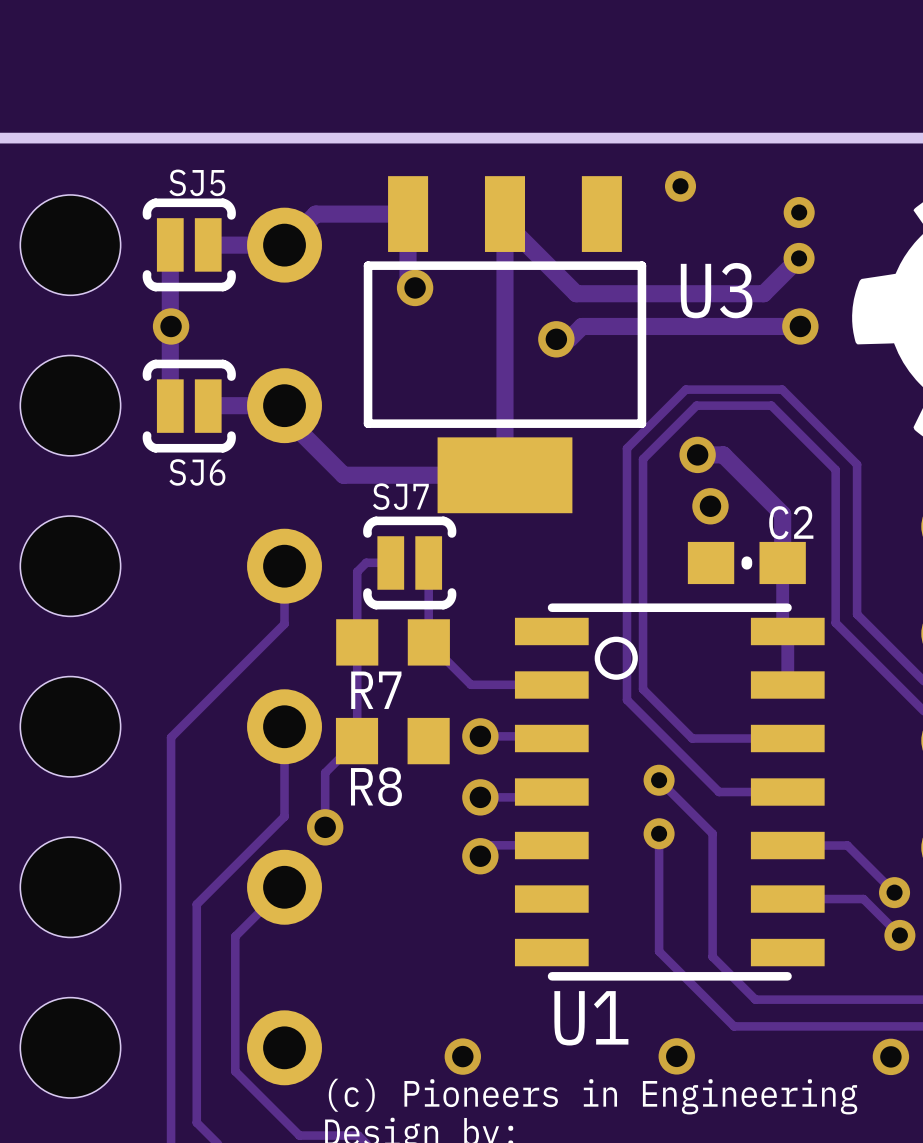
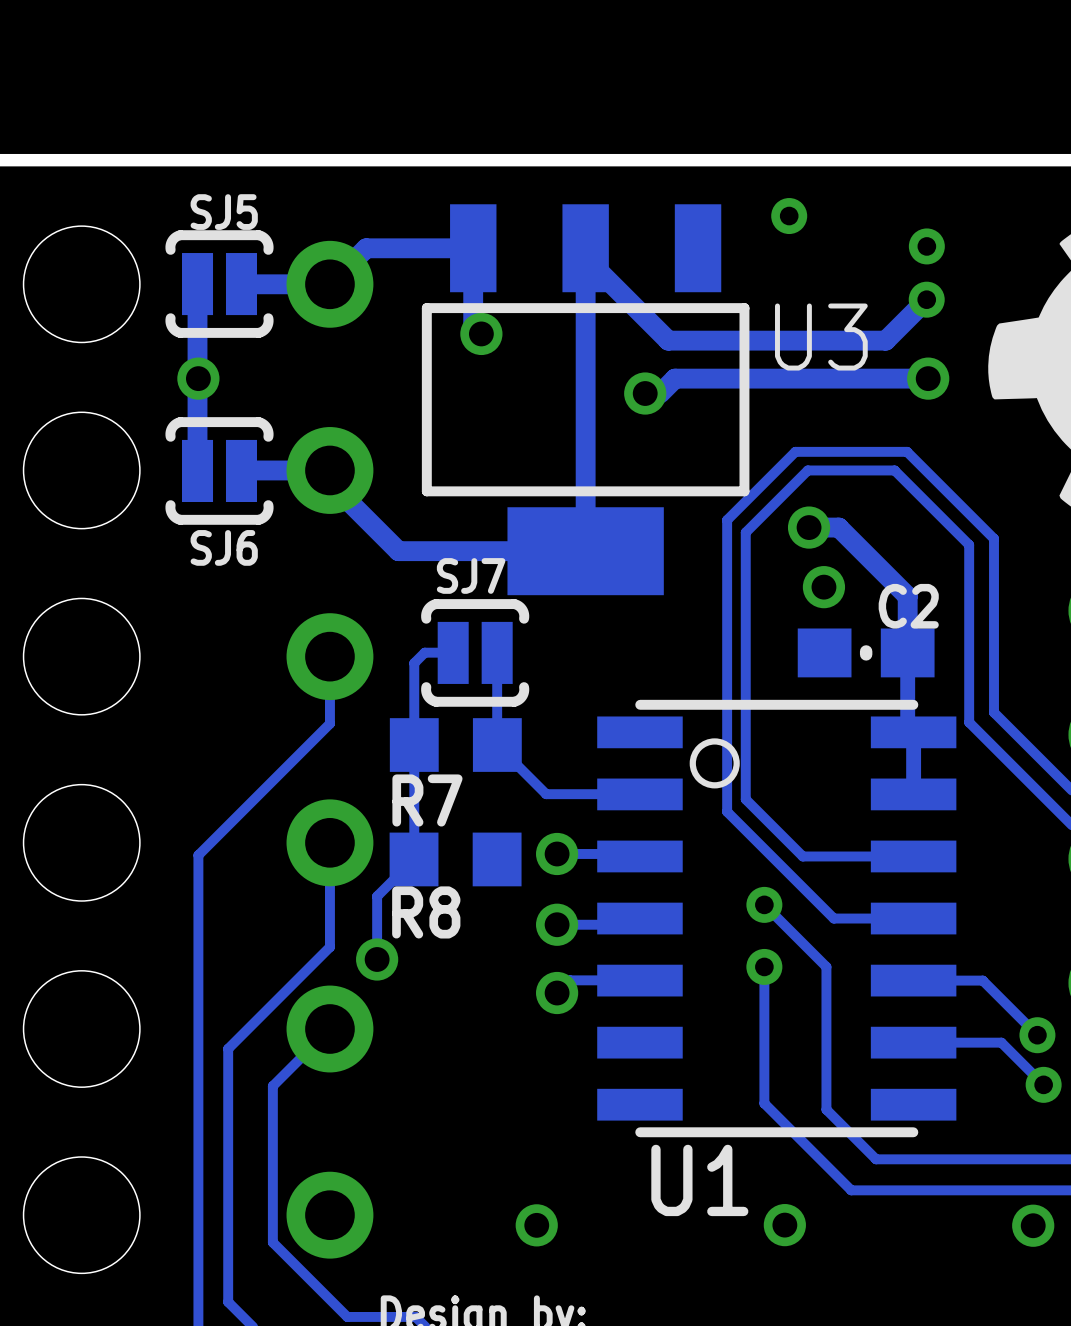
text: (c) Pioneers in Engineering (593, 1096) -> none

